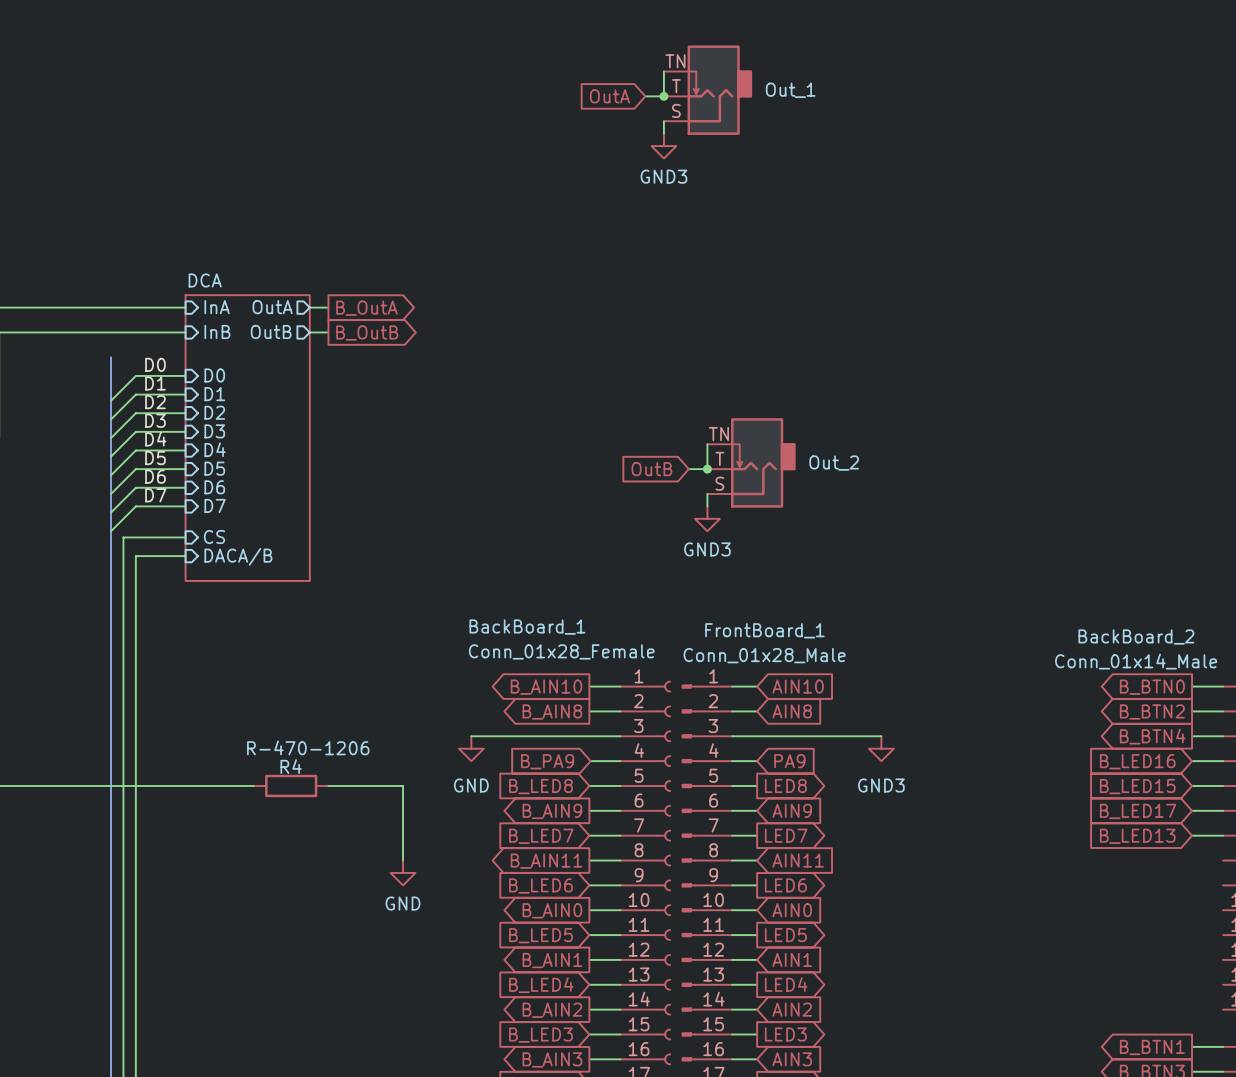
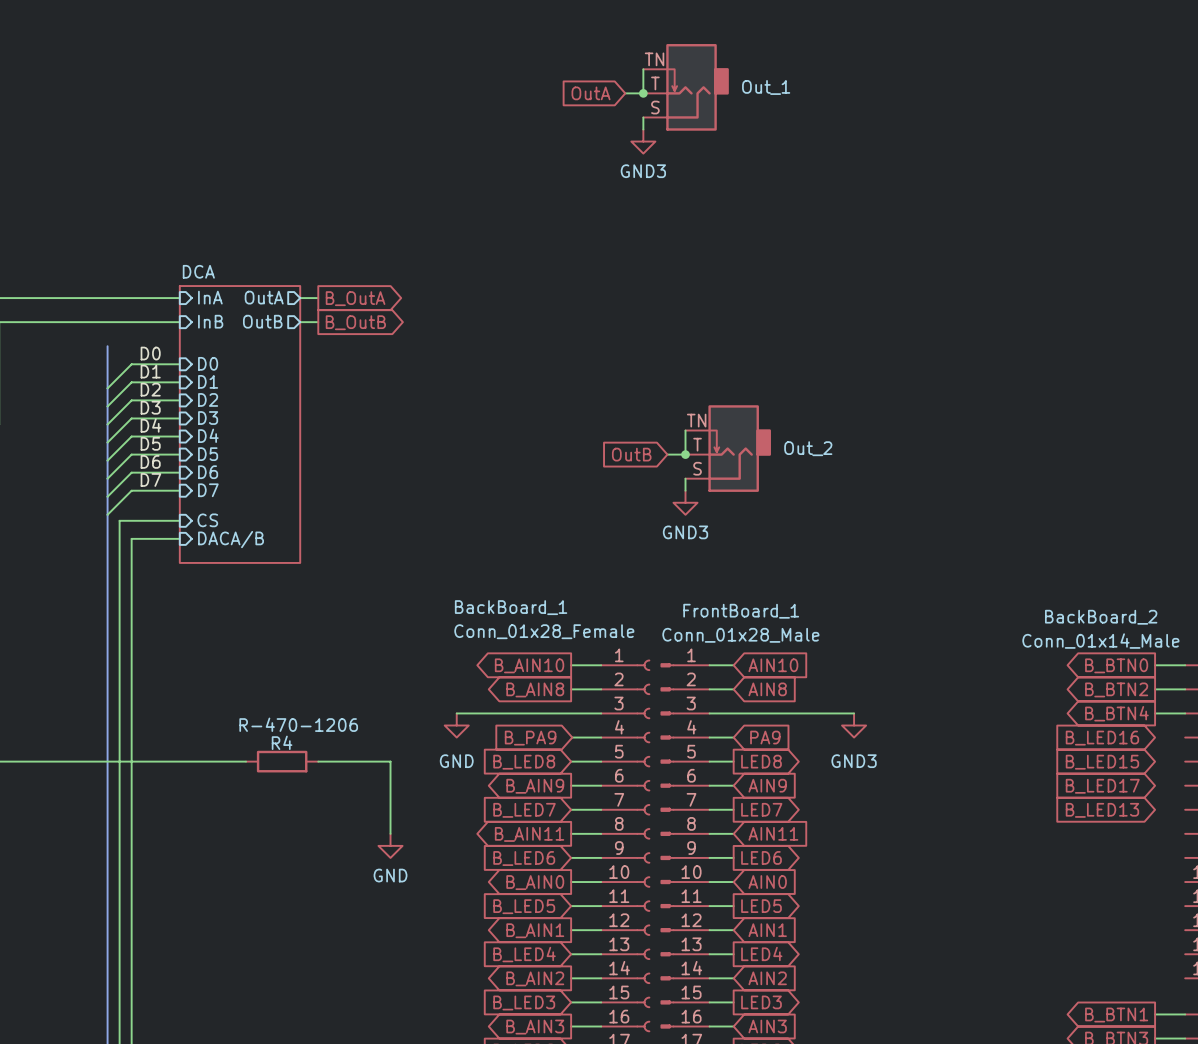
wire: (1192, 761) (1223, 761) -> none
wire: (1192, 785) (1223, 785) -> none
wire: (1192, 810) (1223, 810) -> none
wire: (1192, 835) (1223, 835) -> none

